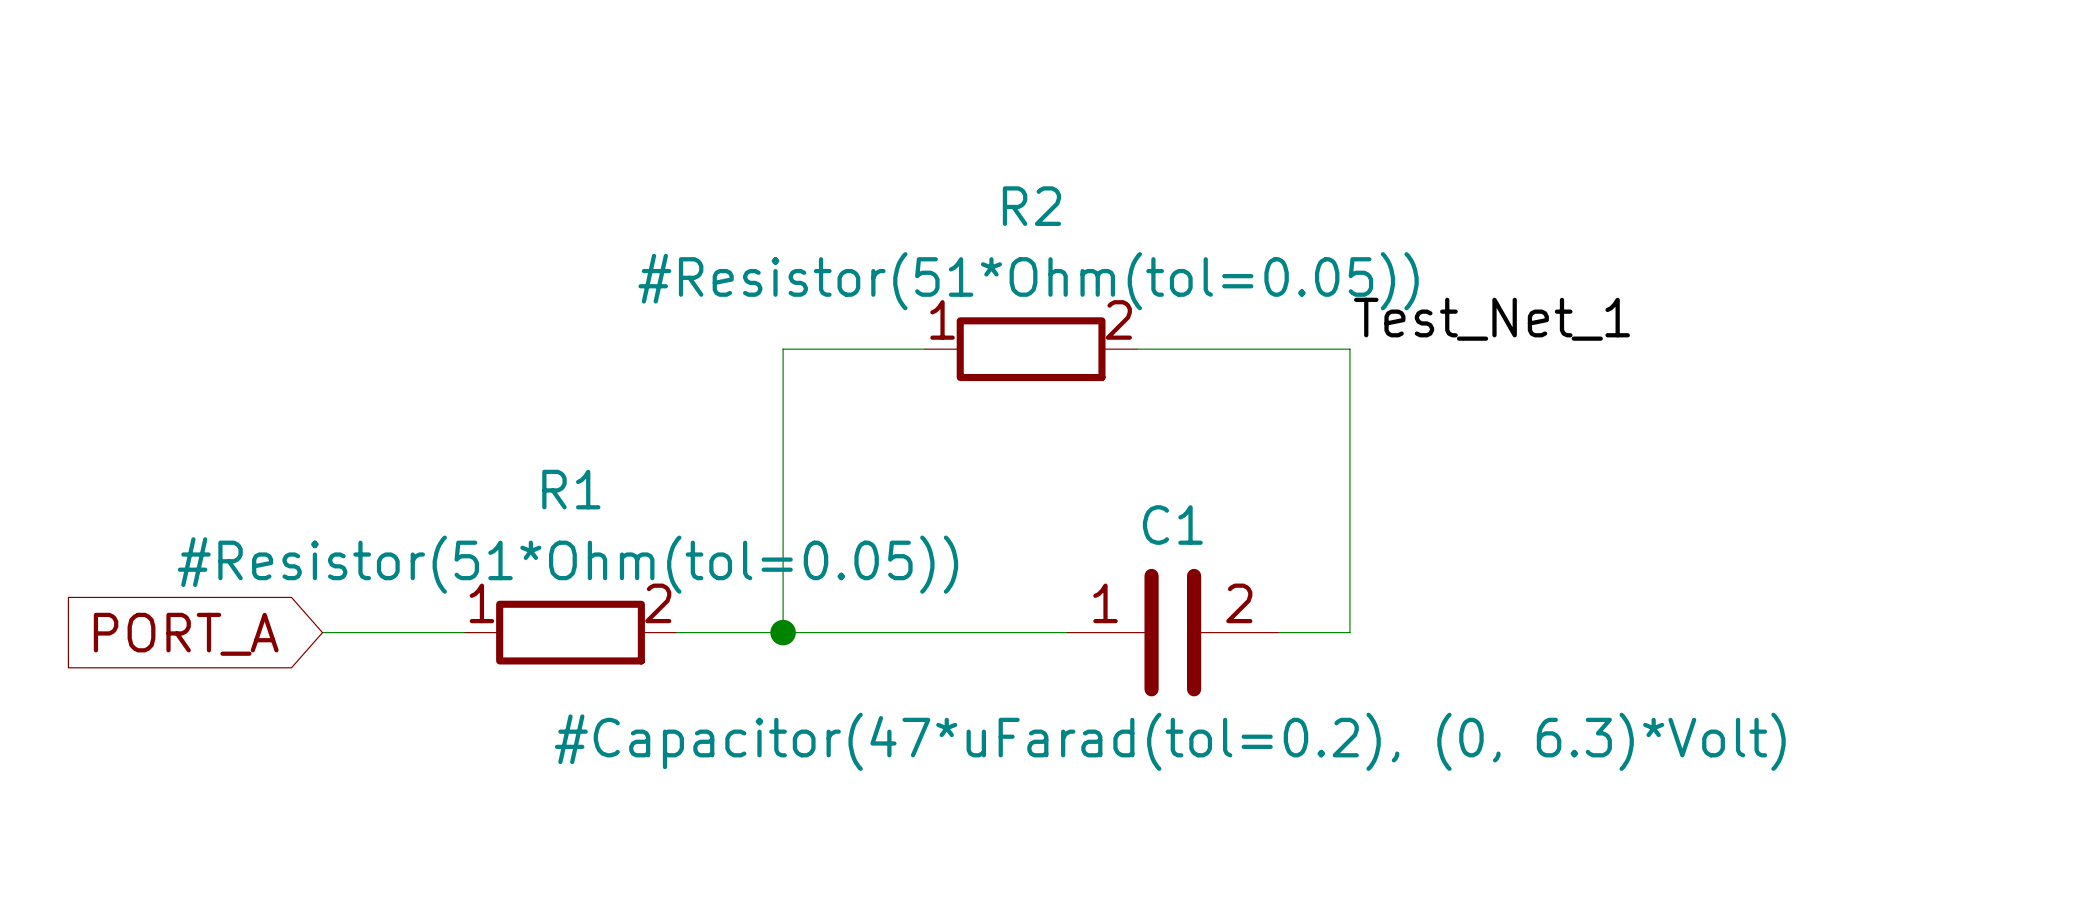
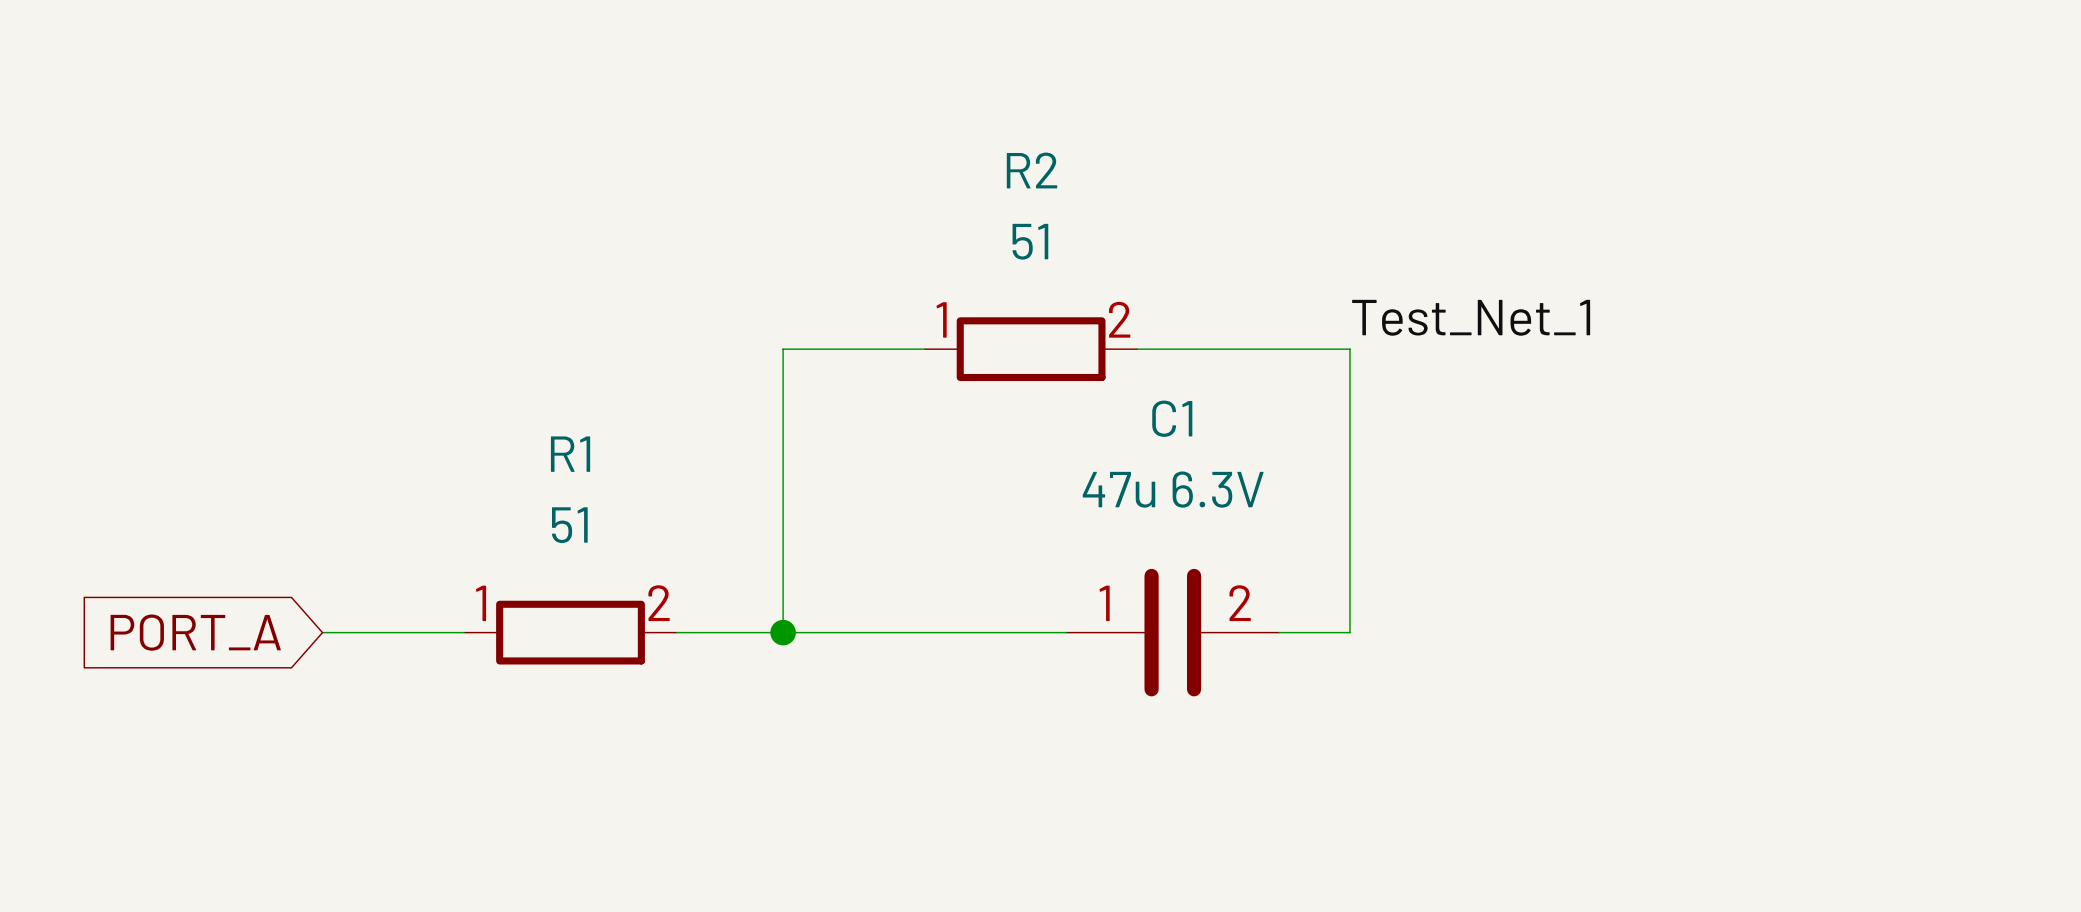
R2 name position: R2 (1031, 206) -> R2 (1032, 170)
R2 value: #Resistor(51*Ohm(tol=0.05)) (1028, 281) -> 51 (1030, 241)
R1 name position: R1 (571, 489) -> R1 (570, 454)
C1 name position: C1 (1172, 524) -> C1 (1172, 418)
R1 value: #Resistor(51*Ohm(tol=0.05)) (567, 564) -> 51 (569, 525)
C1 value: #Capacitor(47*uFarad(tol=0.2), (0, 6.3)*Volt) (1170, 741) -> 47u 6.3V (1173, 489)

